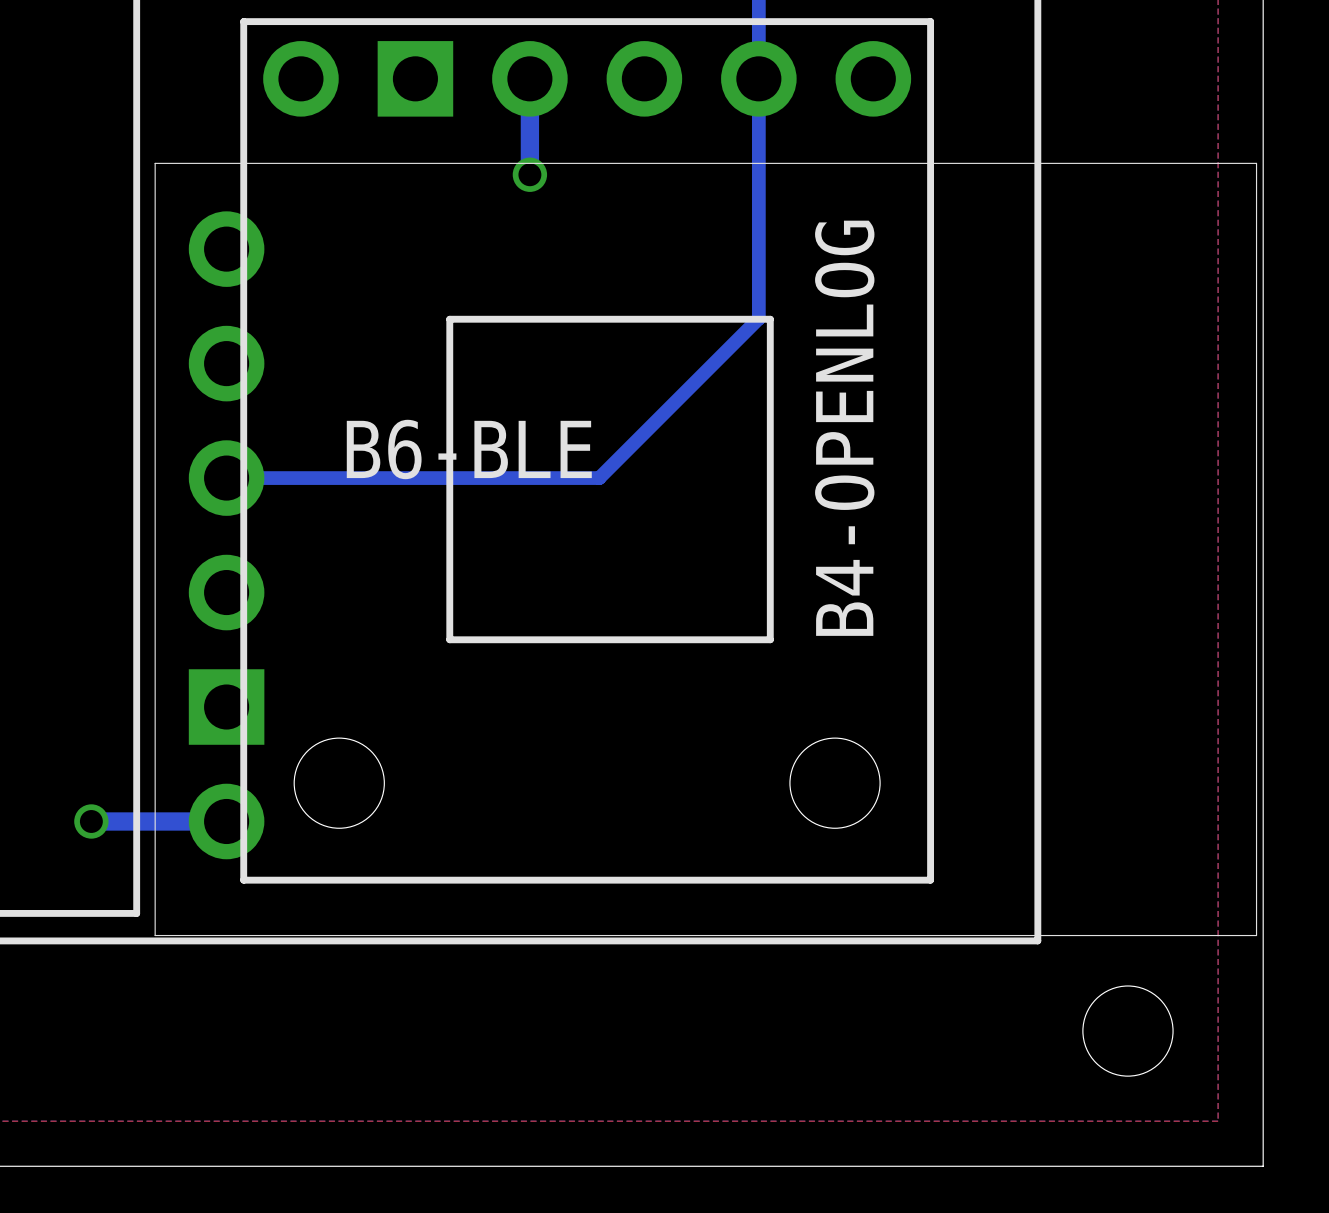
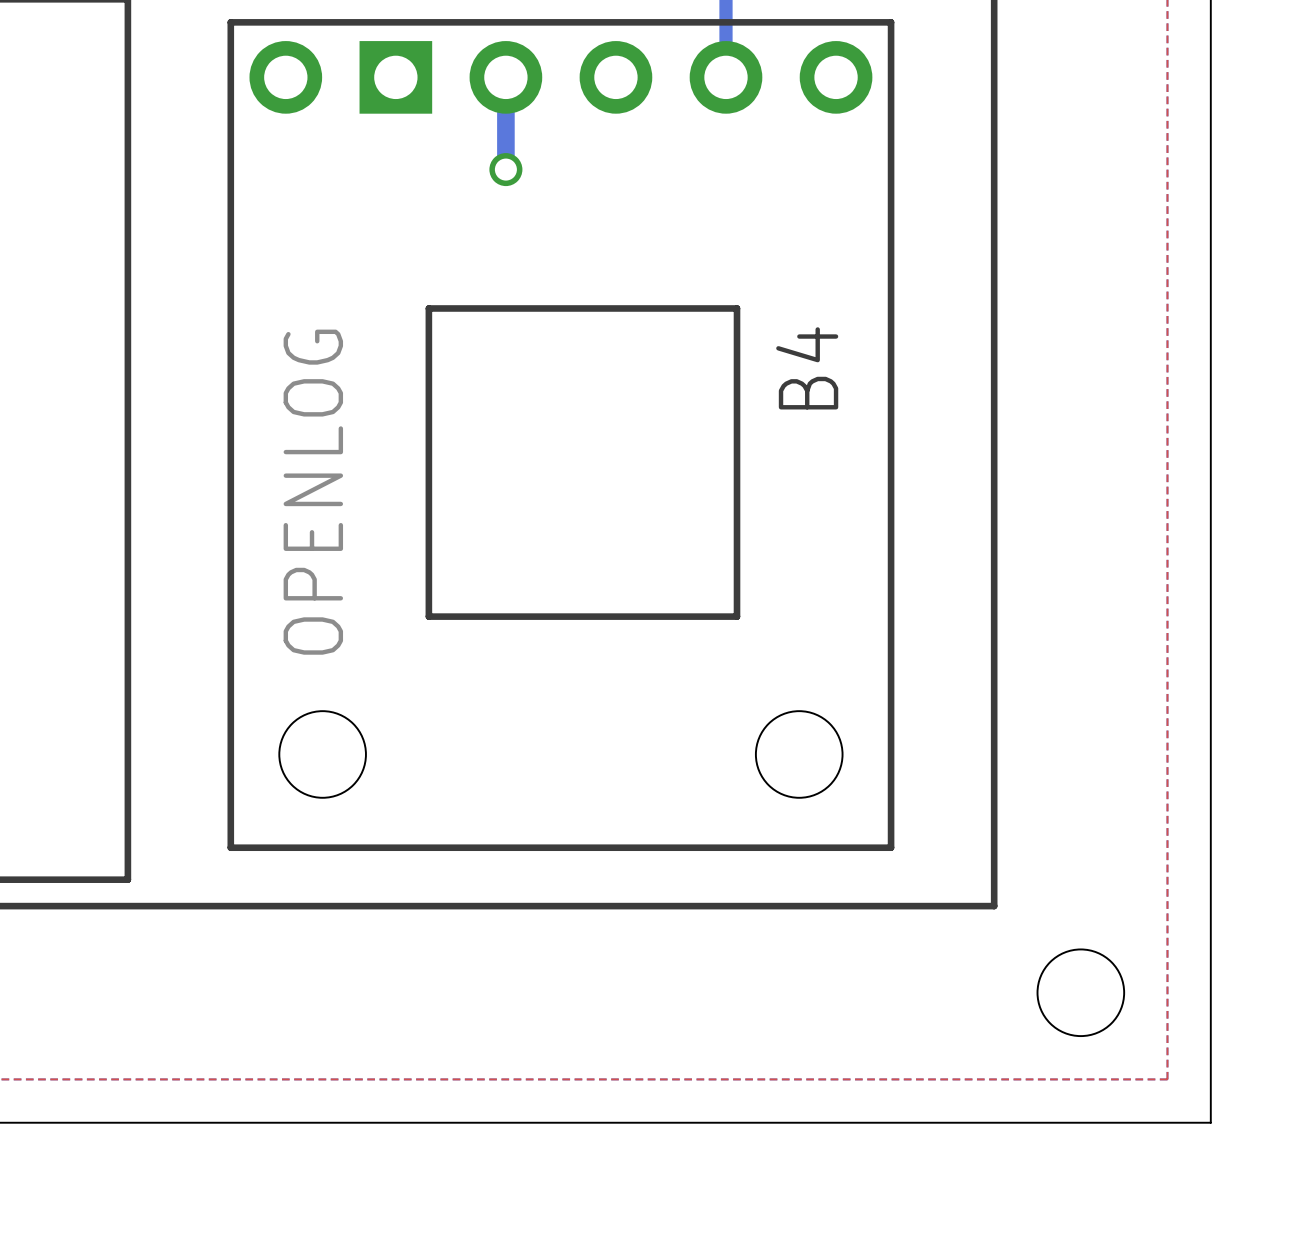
bottom track: (758, 78) (758, 318) (599, 478) (226, 478) -> none
B4-OPENLOG name: B4-OPENLOG (844, 428) -> B4 (807, 368)
B4-OPENLOG value: none -> OPENLOG (313, 492)
B6-BLE: (705, 549) -> none
bottom track: (91, 821) (226, 821) -> none
via: (91, 821) -> none

